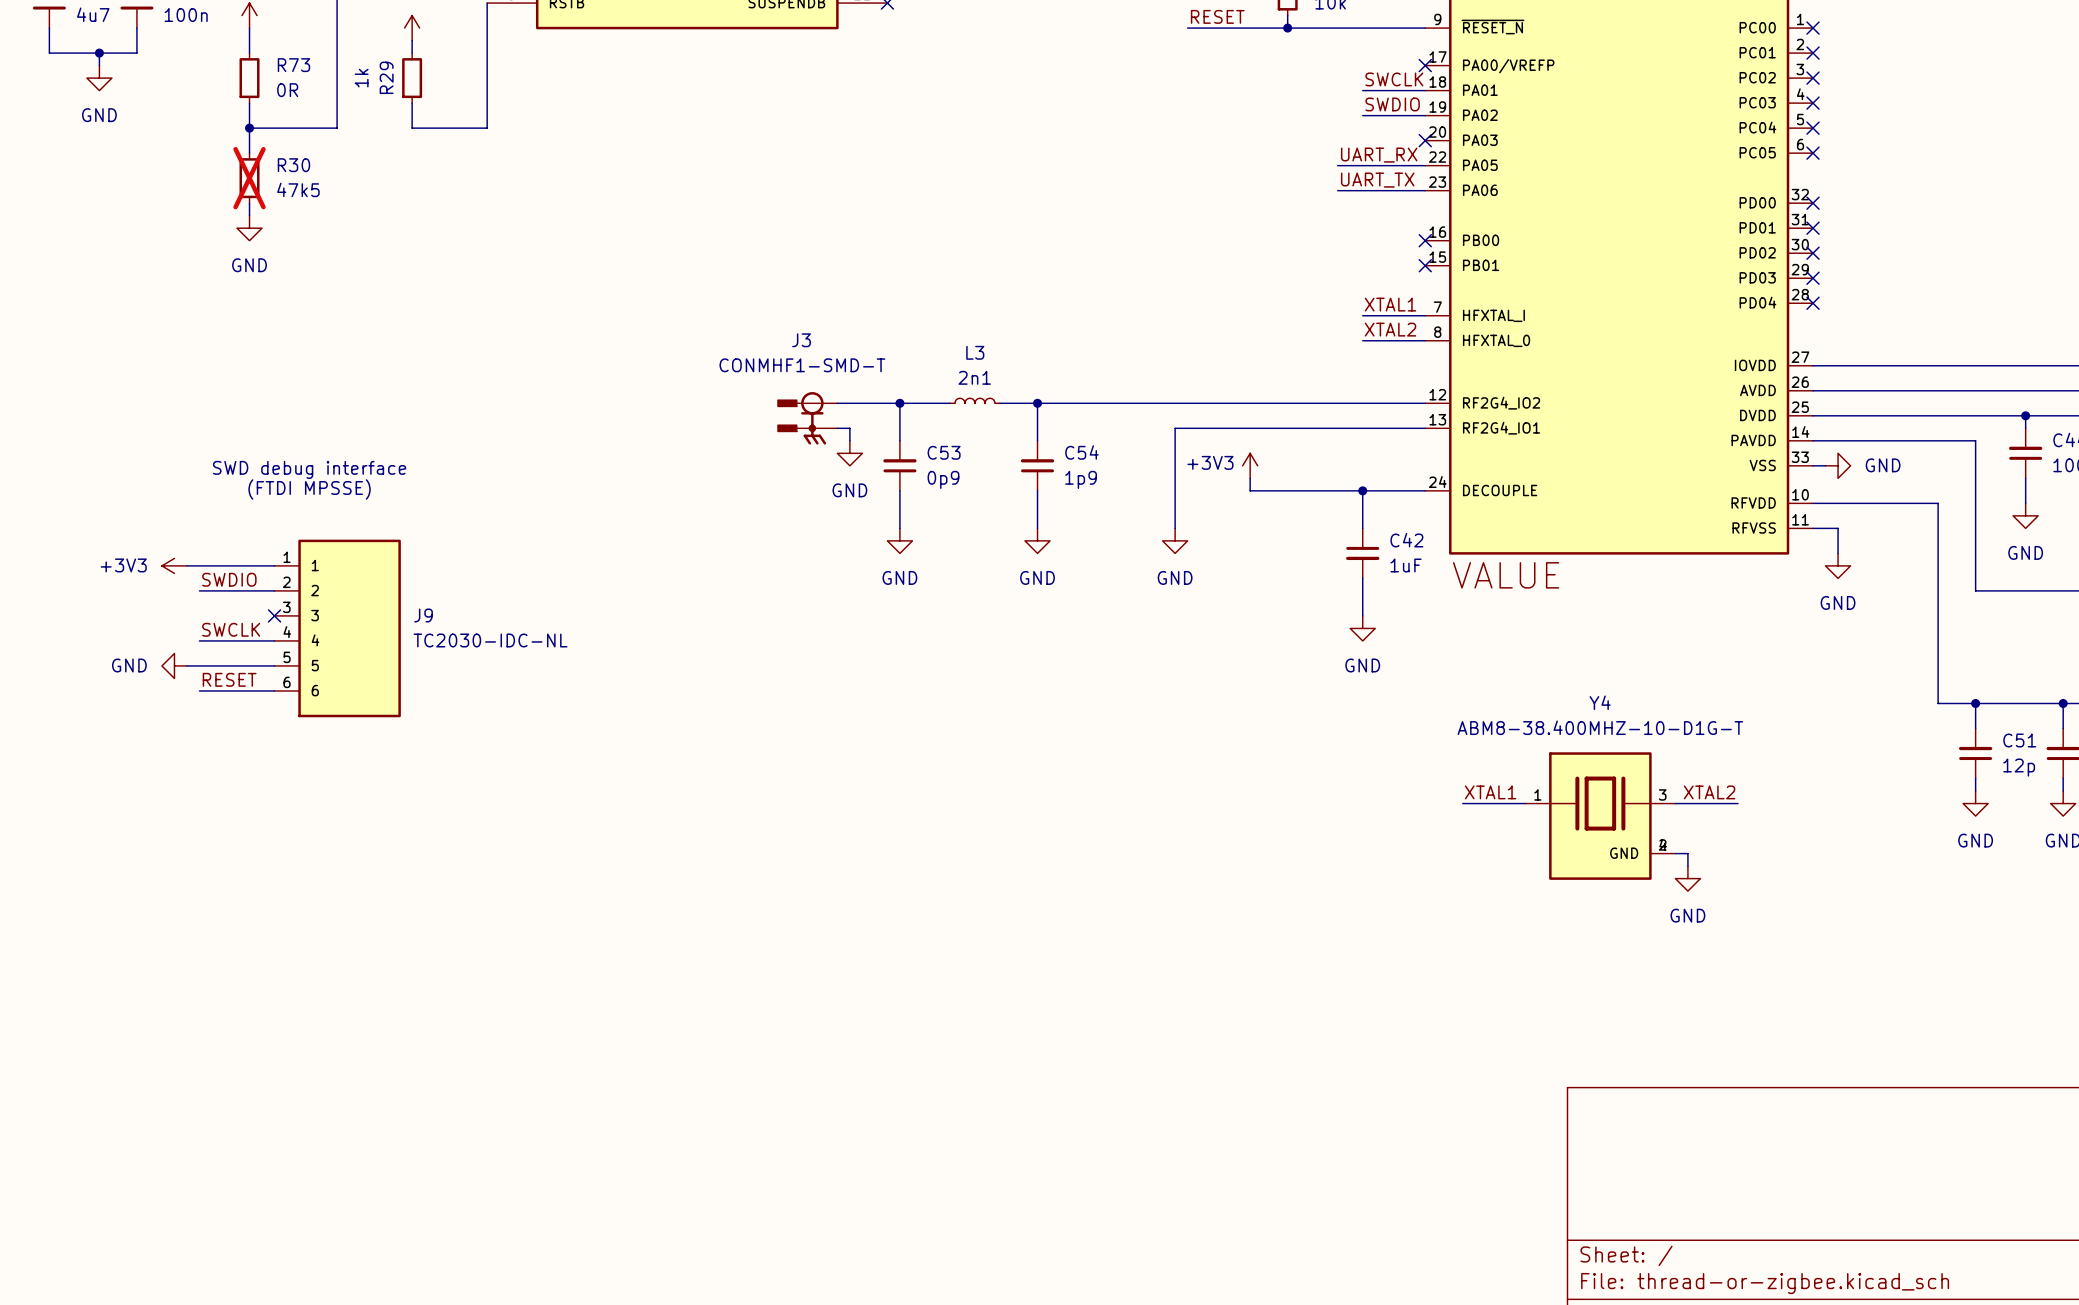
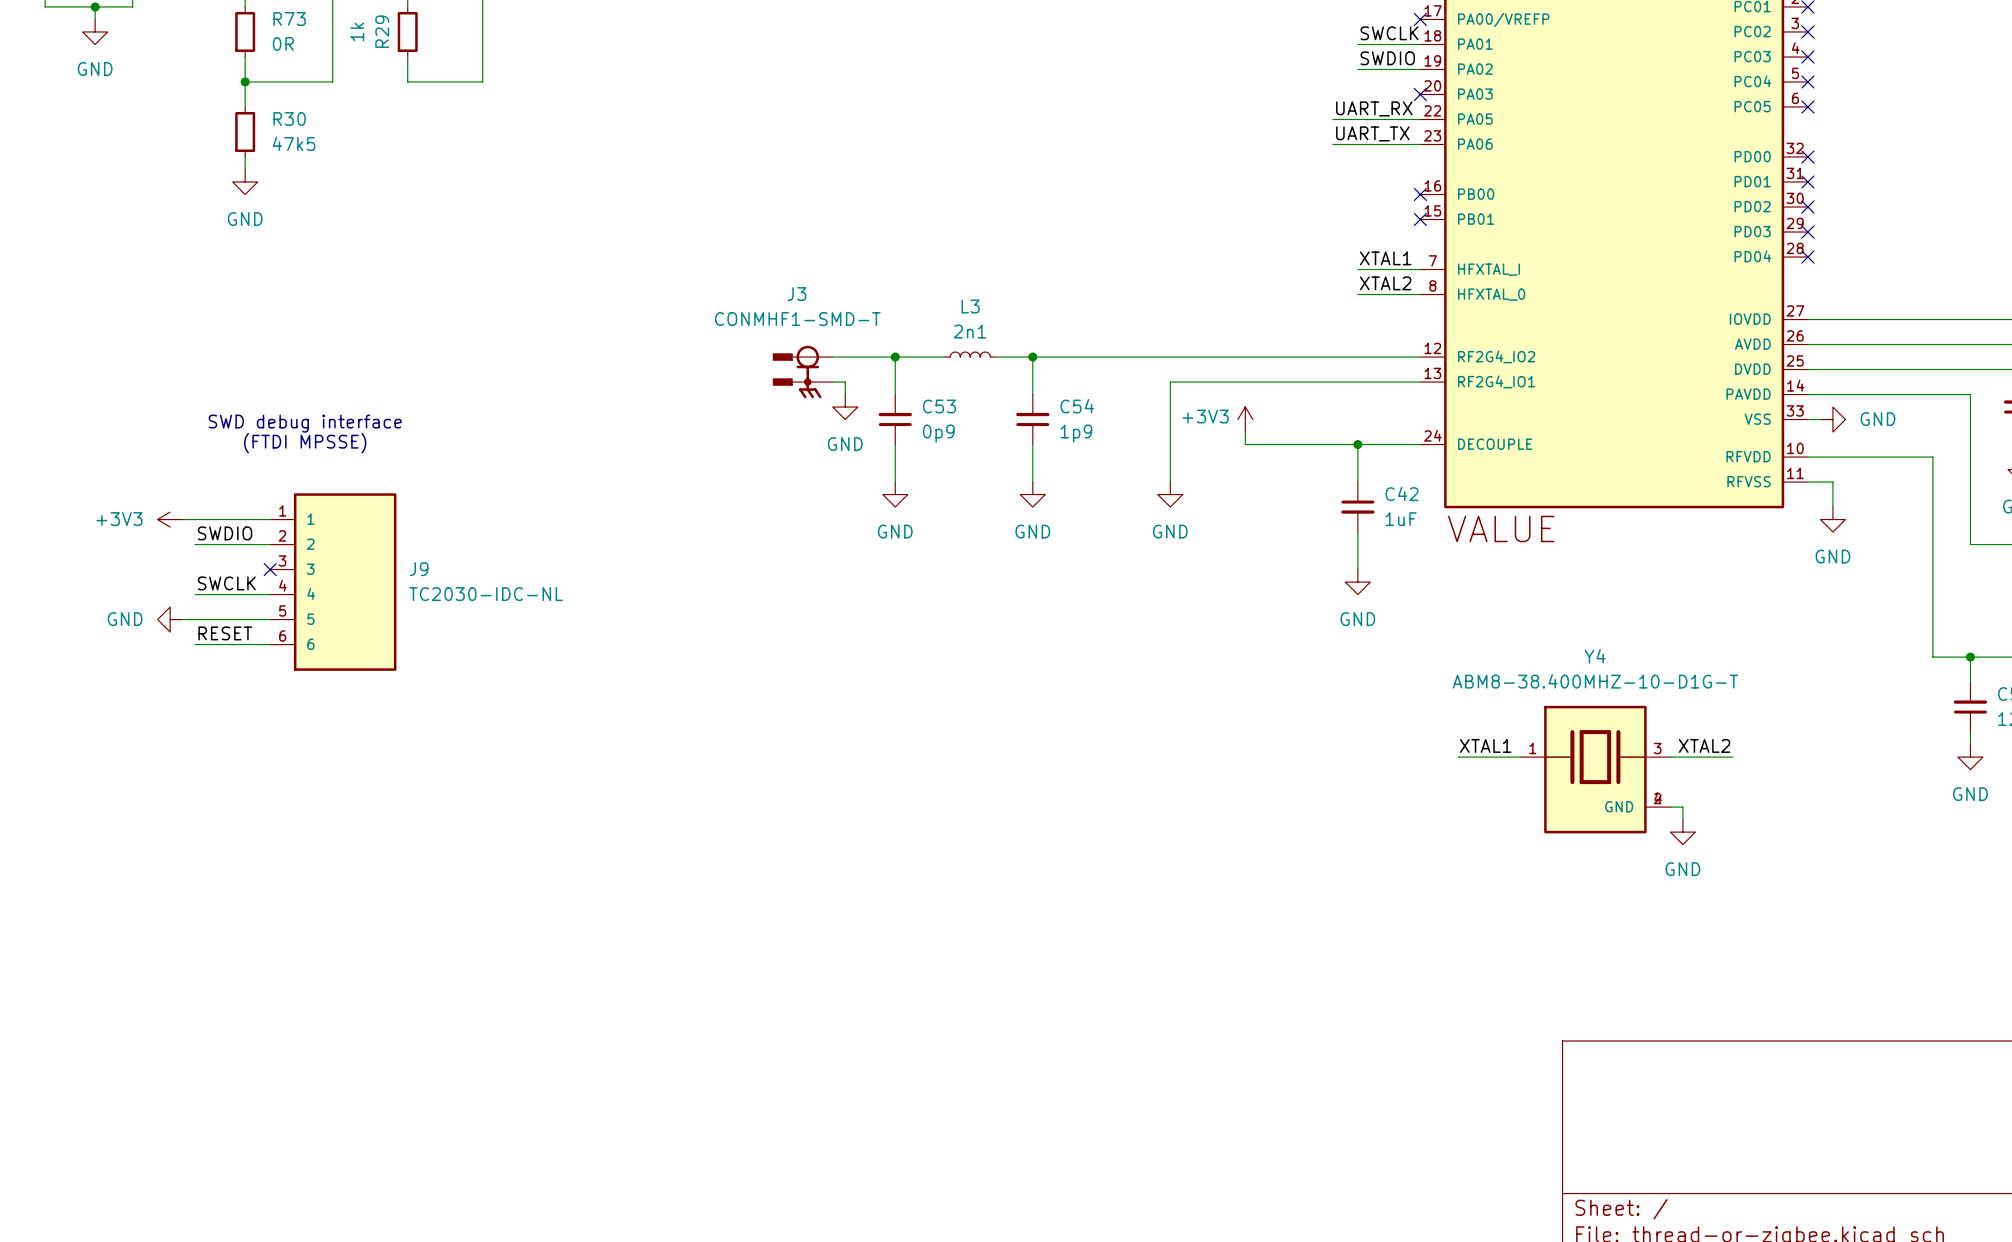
R30 do-not-place cross: (249, 178) -> none

